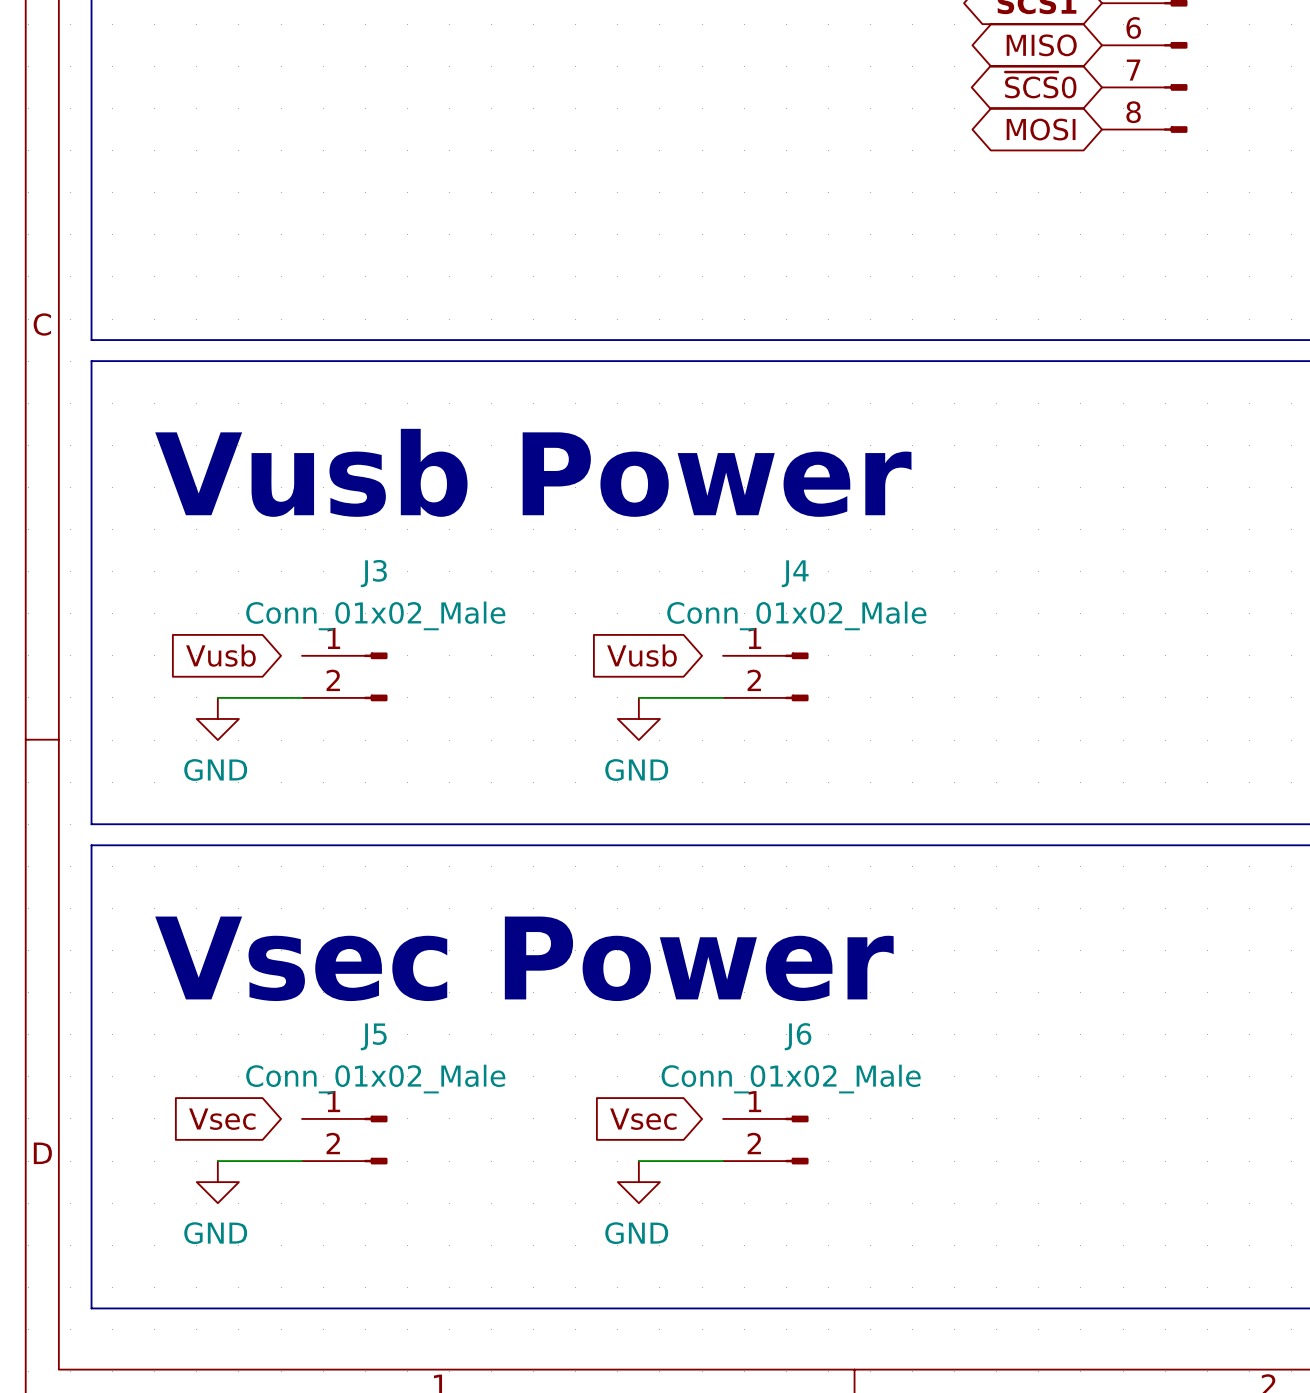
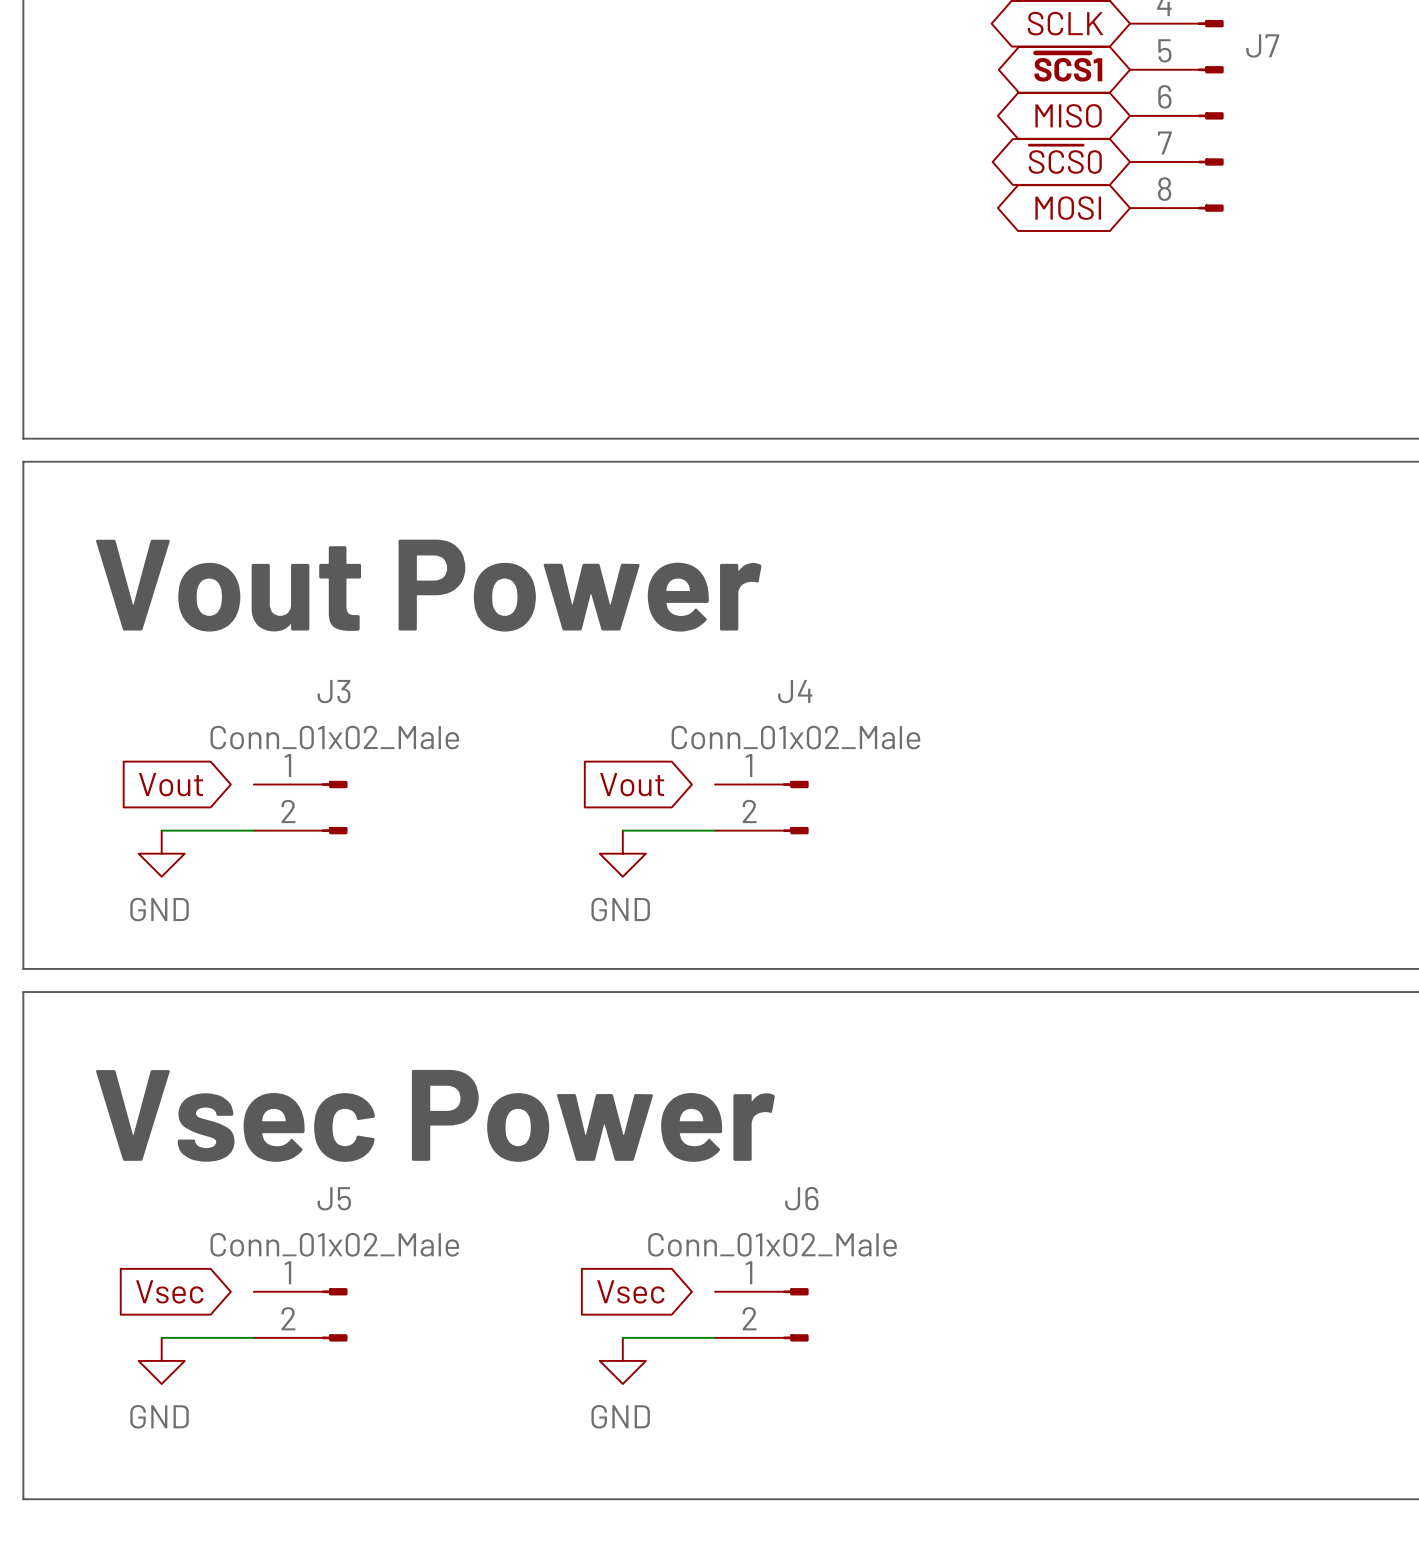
text: Vusb Power (533, 472) -> Vout Power (428, 585)
global label: Vusb (220, 655) -> Vout (171, 784)
global label: Vusb (641, 655) -> Vout (632, 784)

